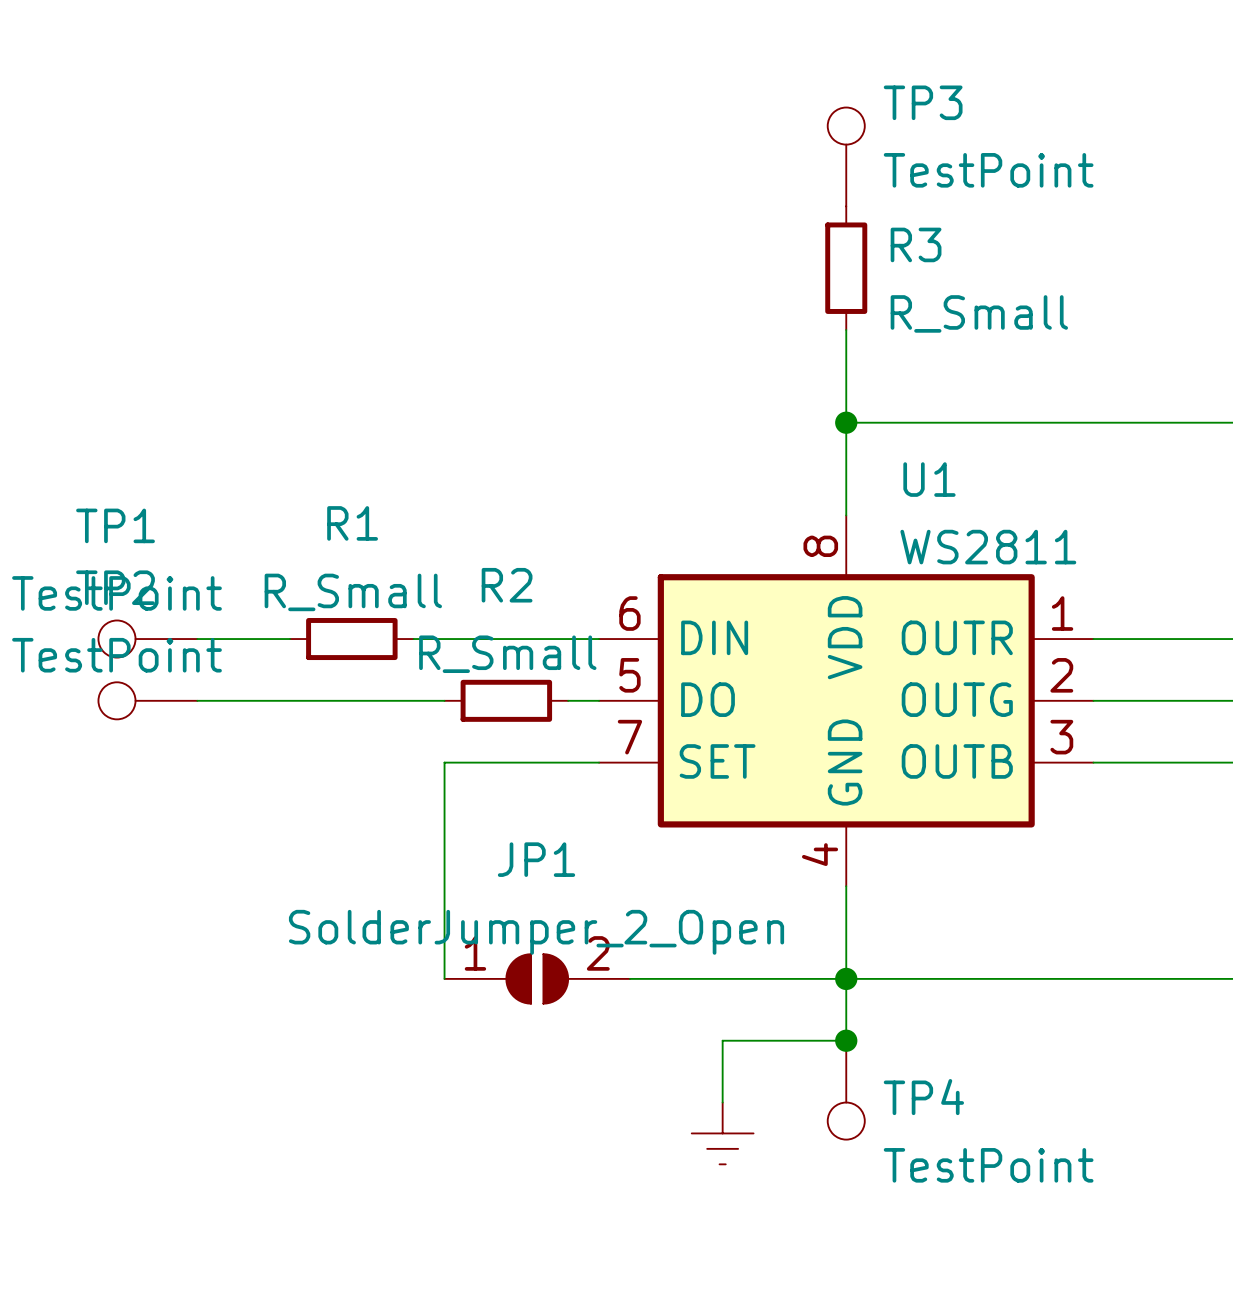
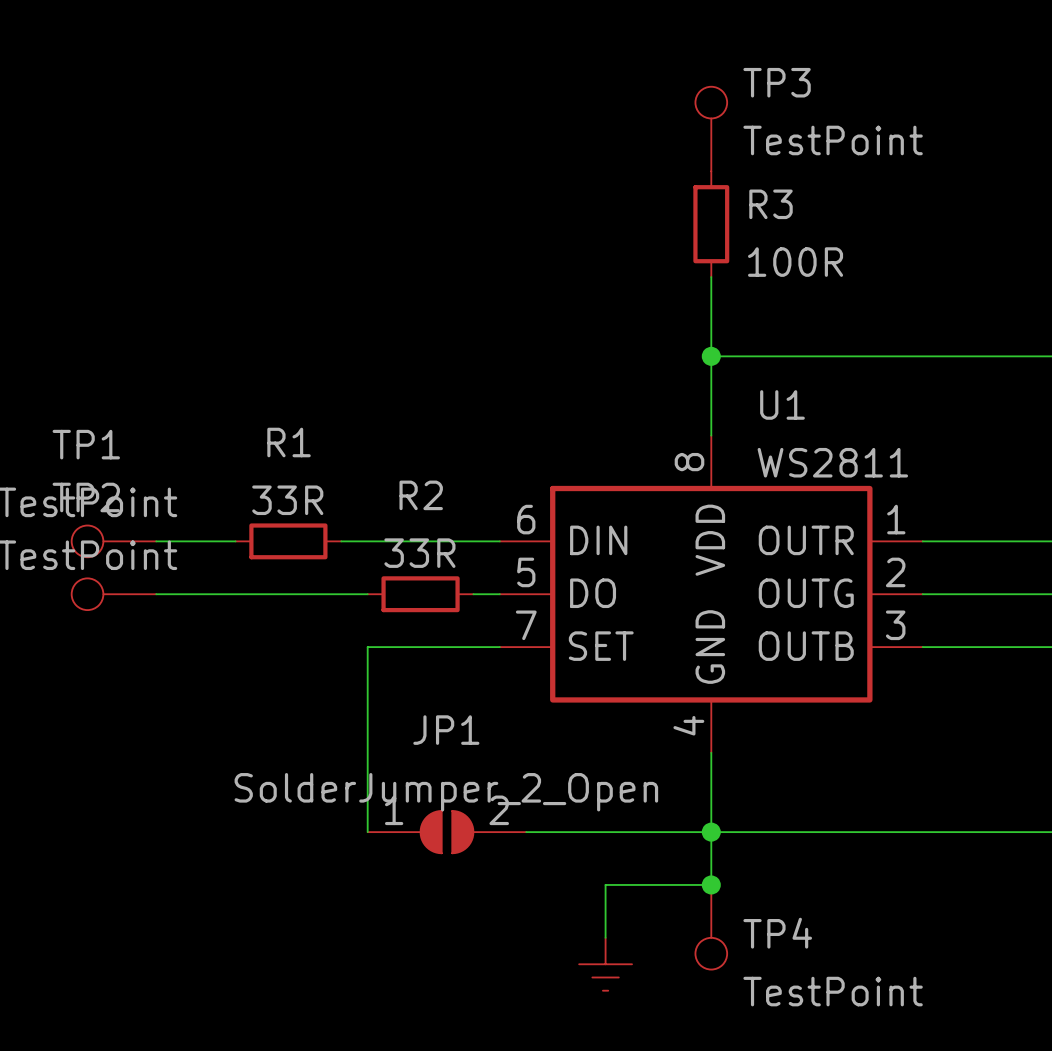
R3 value: R_Small (979, 313) -> 100R (795, 262)
R1 value: R_Small (353, 592) -> 33R (287, 500)
R2 value: R_Small (507, 654) -> 33R (419, 553)

